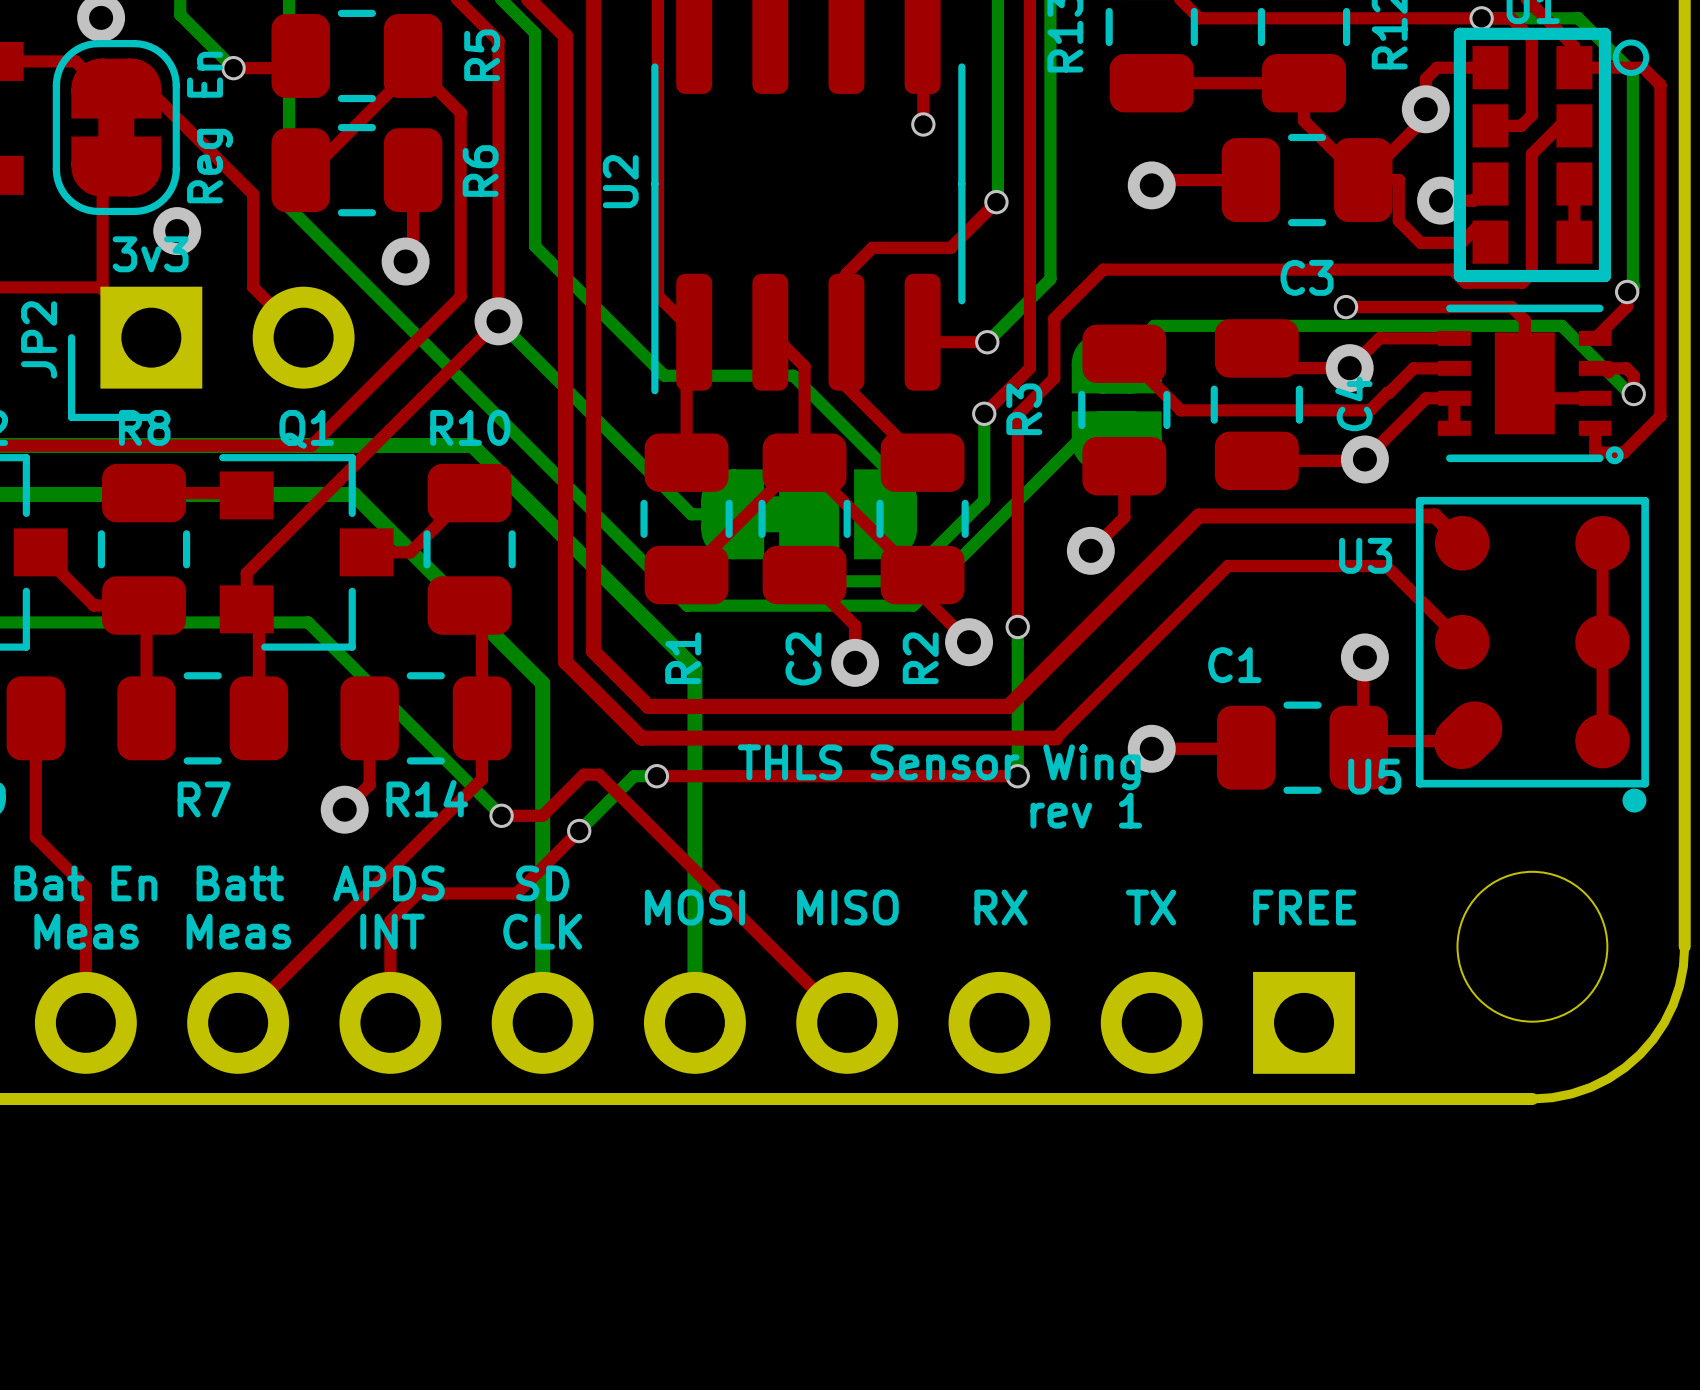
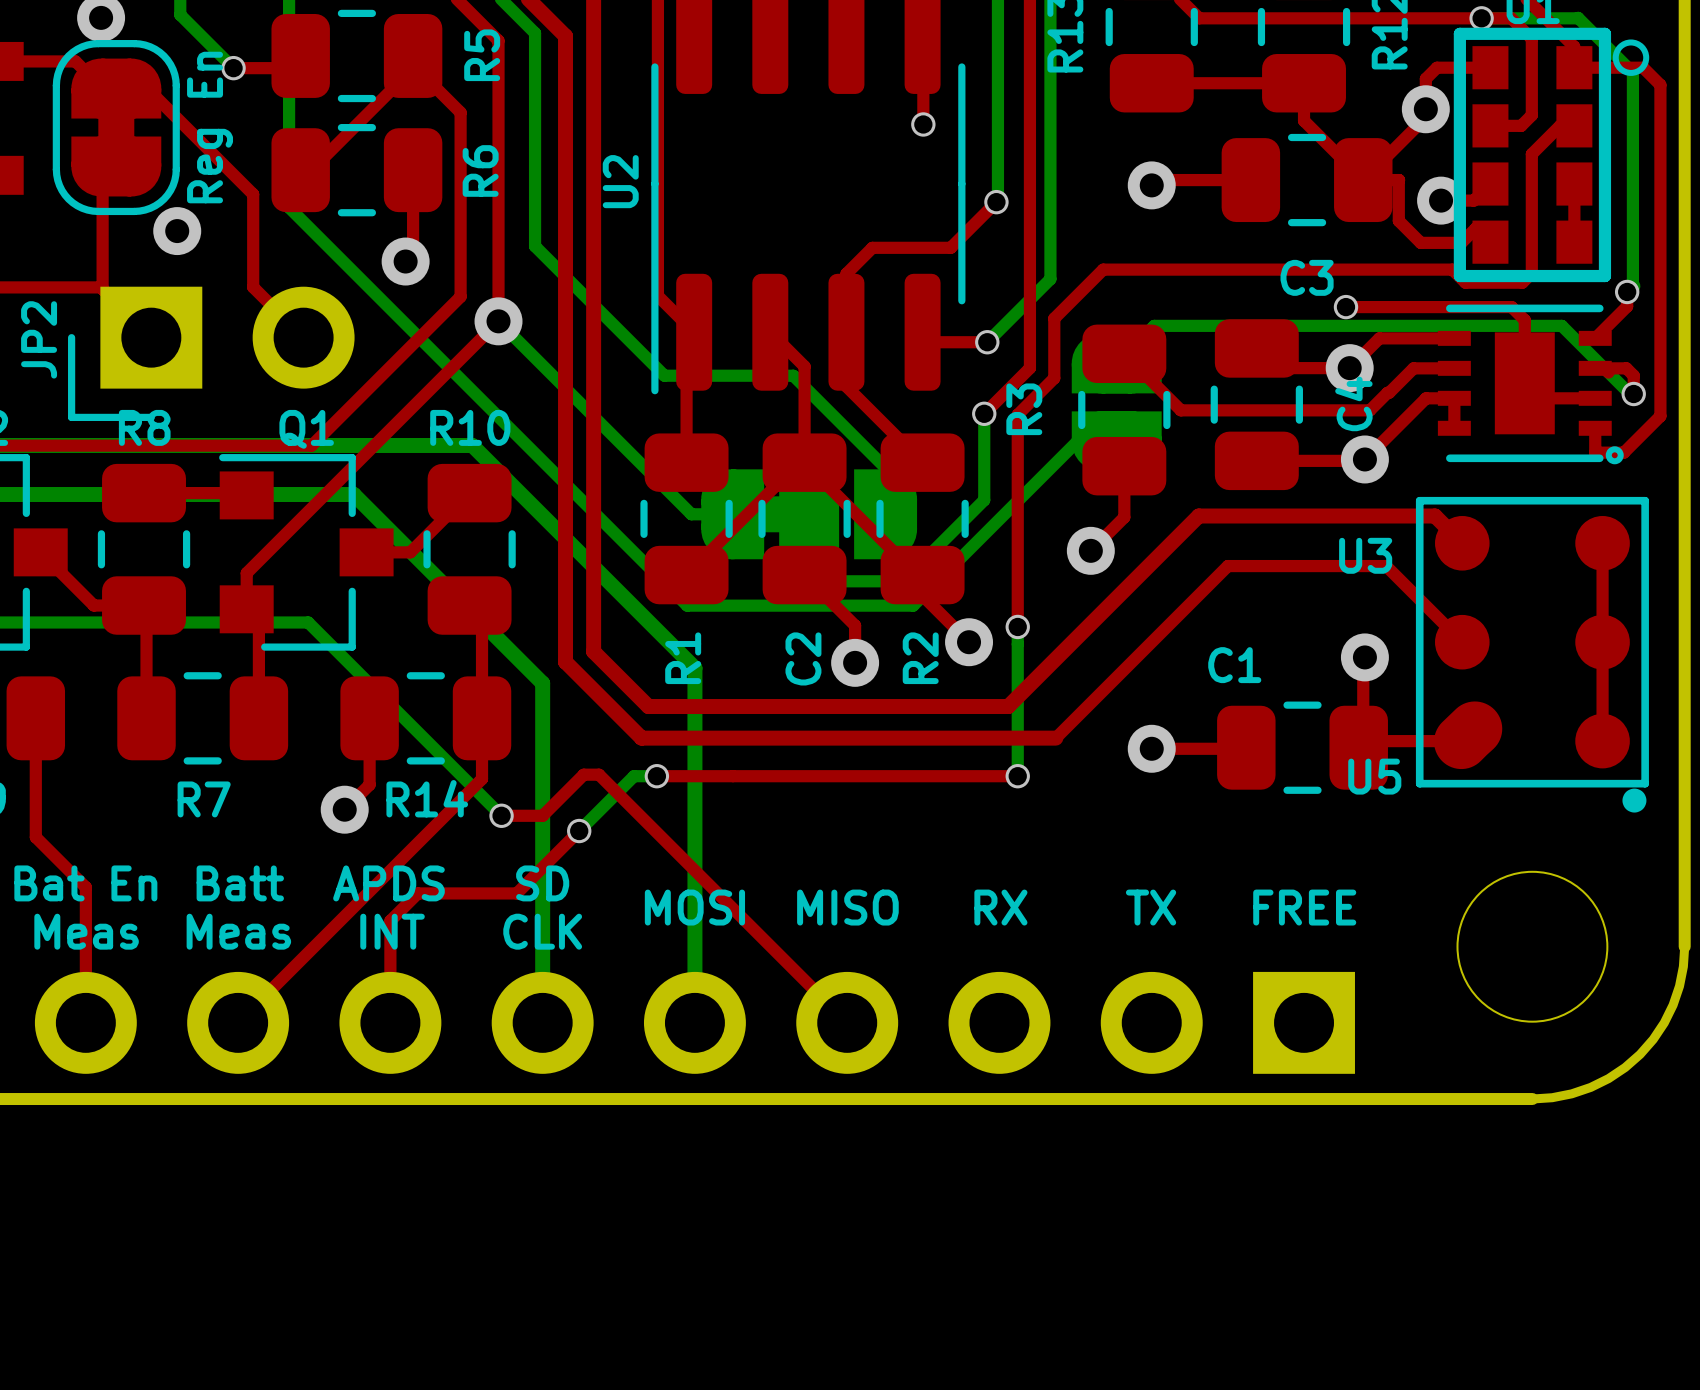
text: 3v3 (150, 254) -> none
text: THLS Sensor Wing (939, 767) -> none
text: rev 1 (1086, 810) -> none

